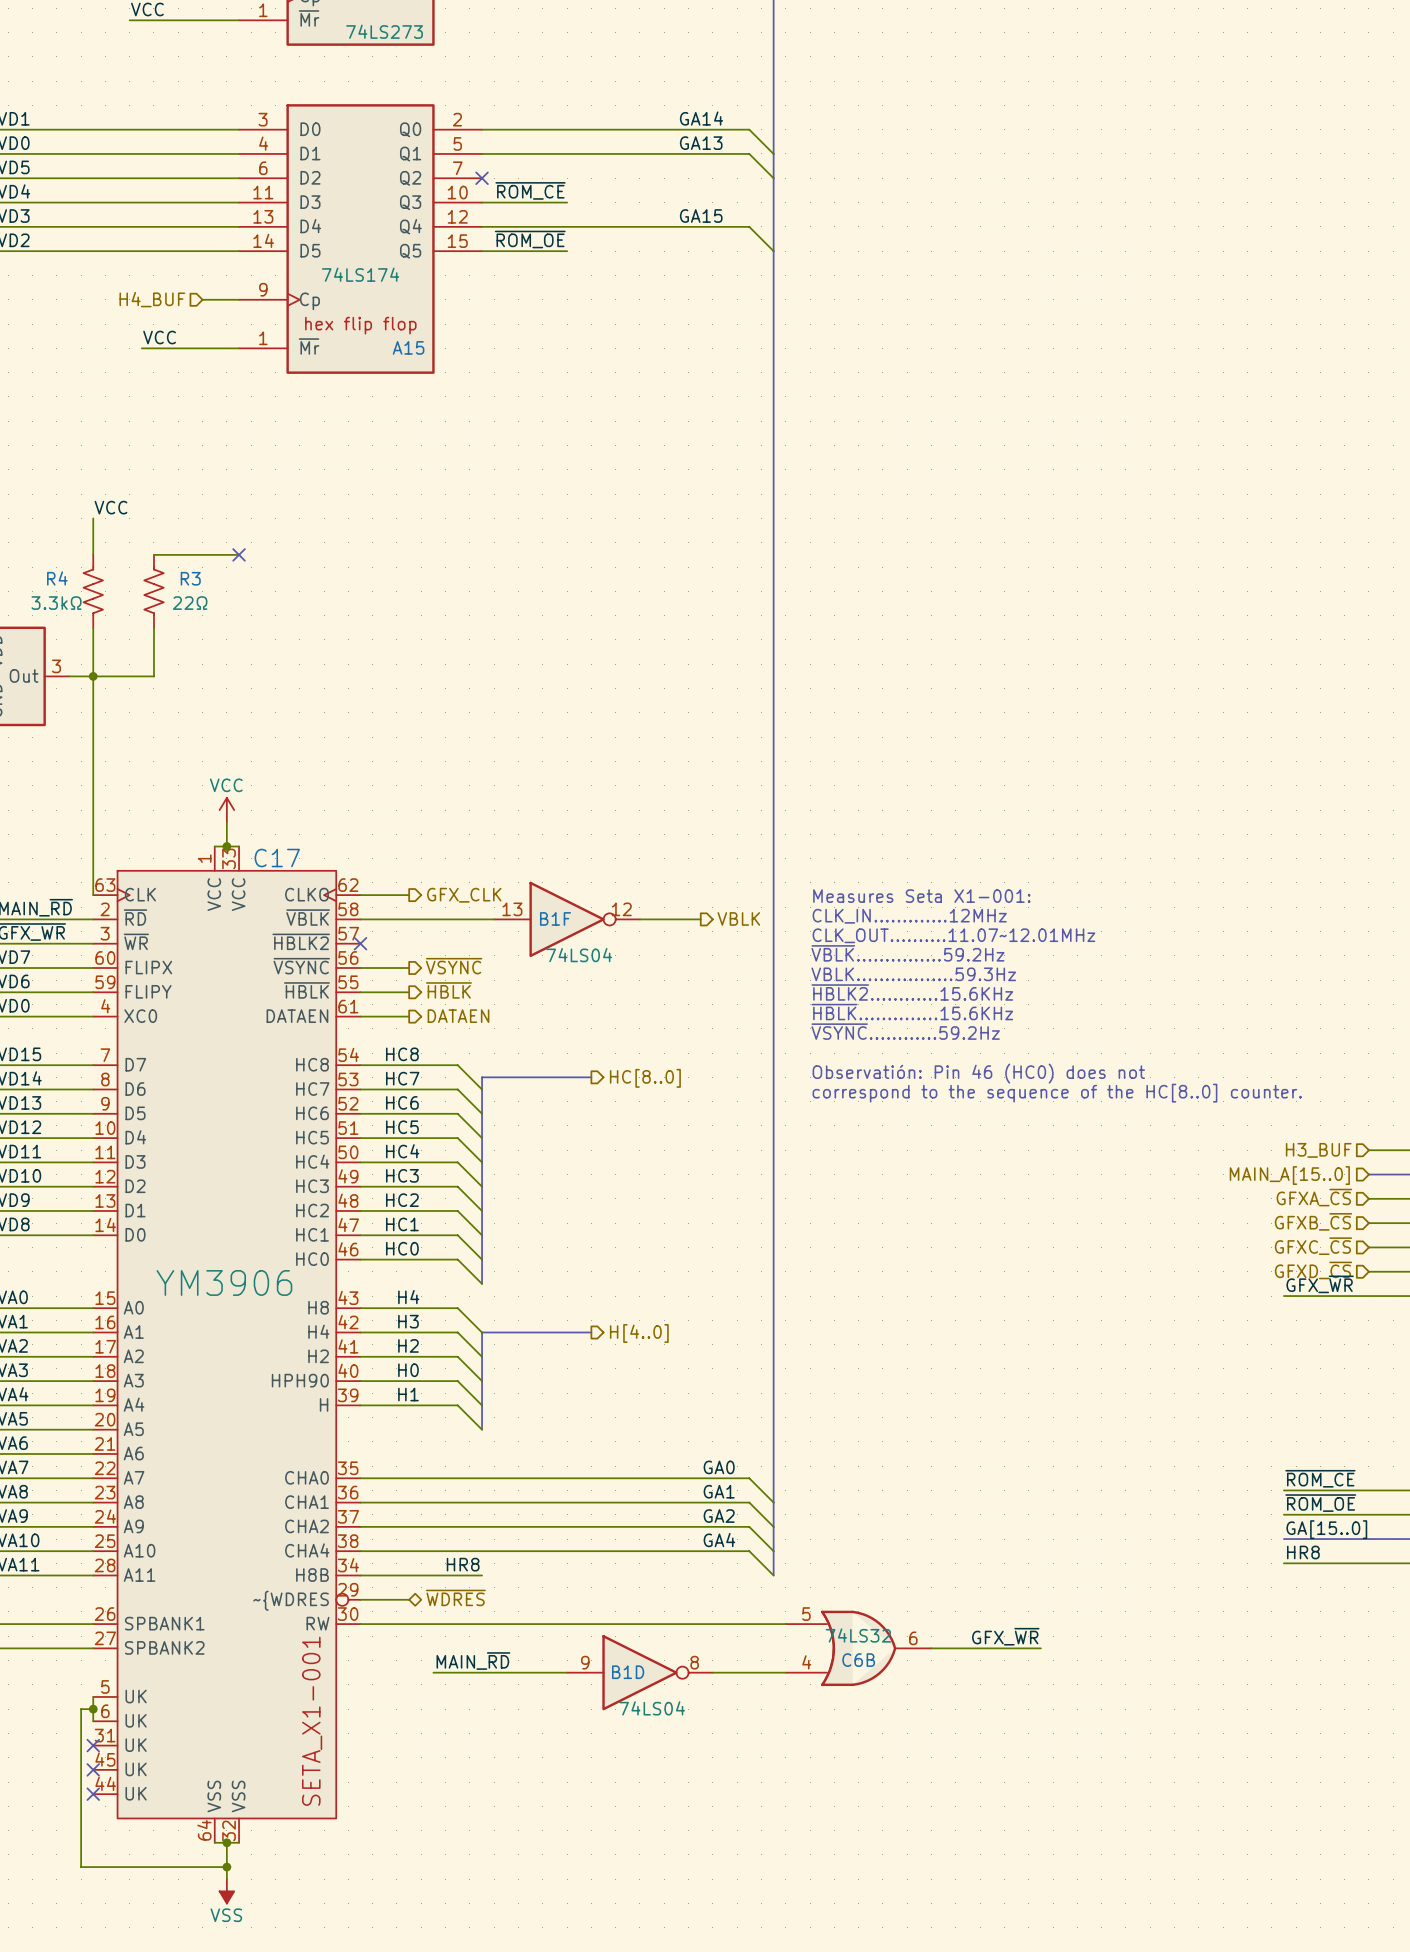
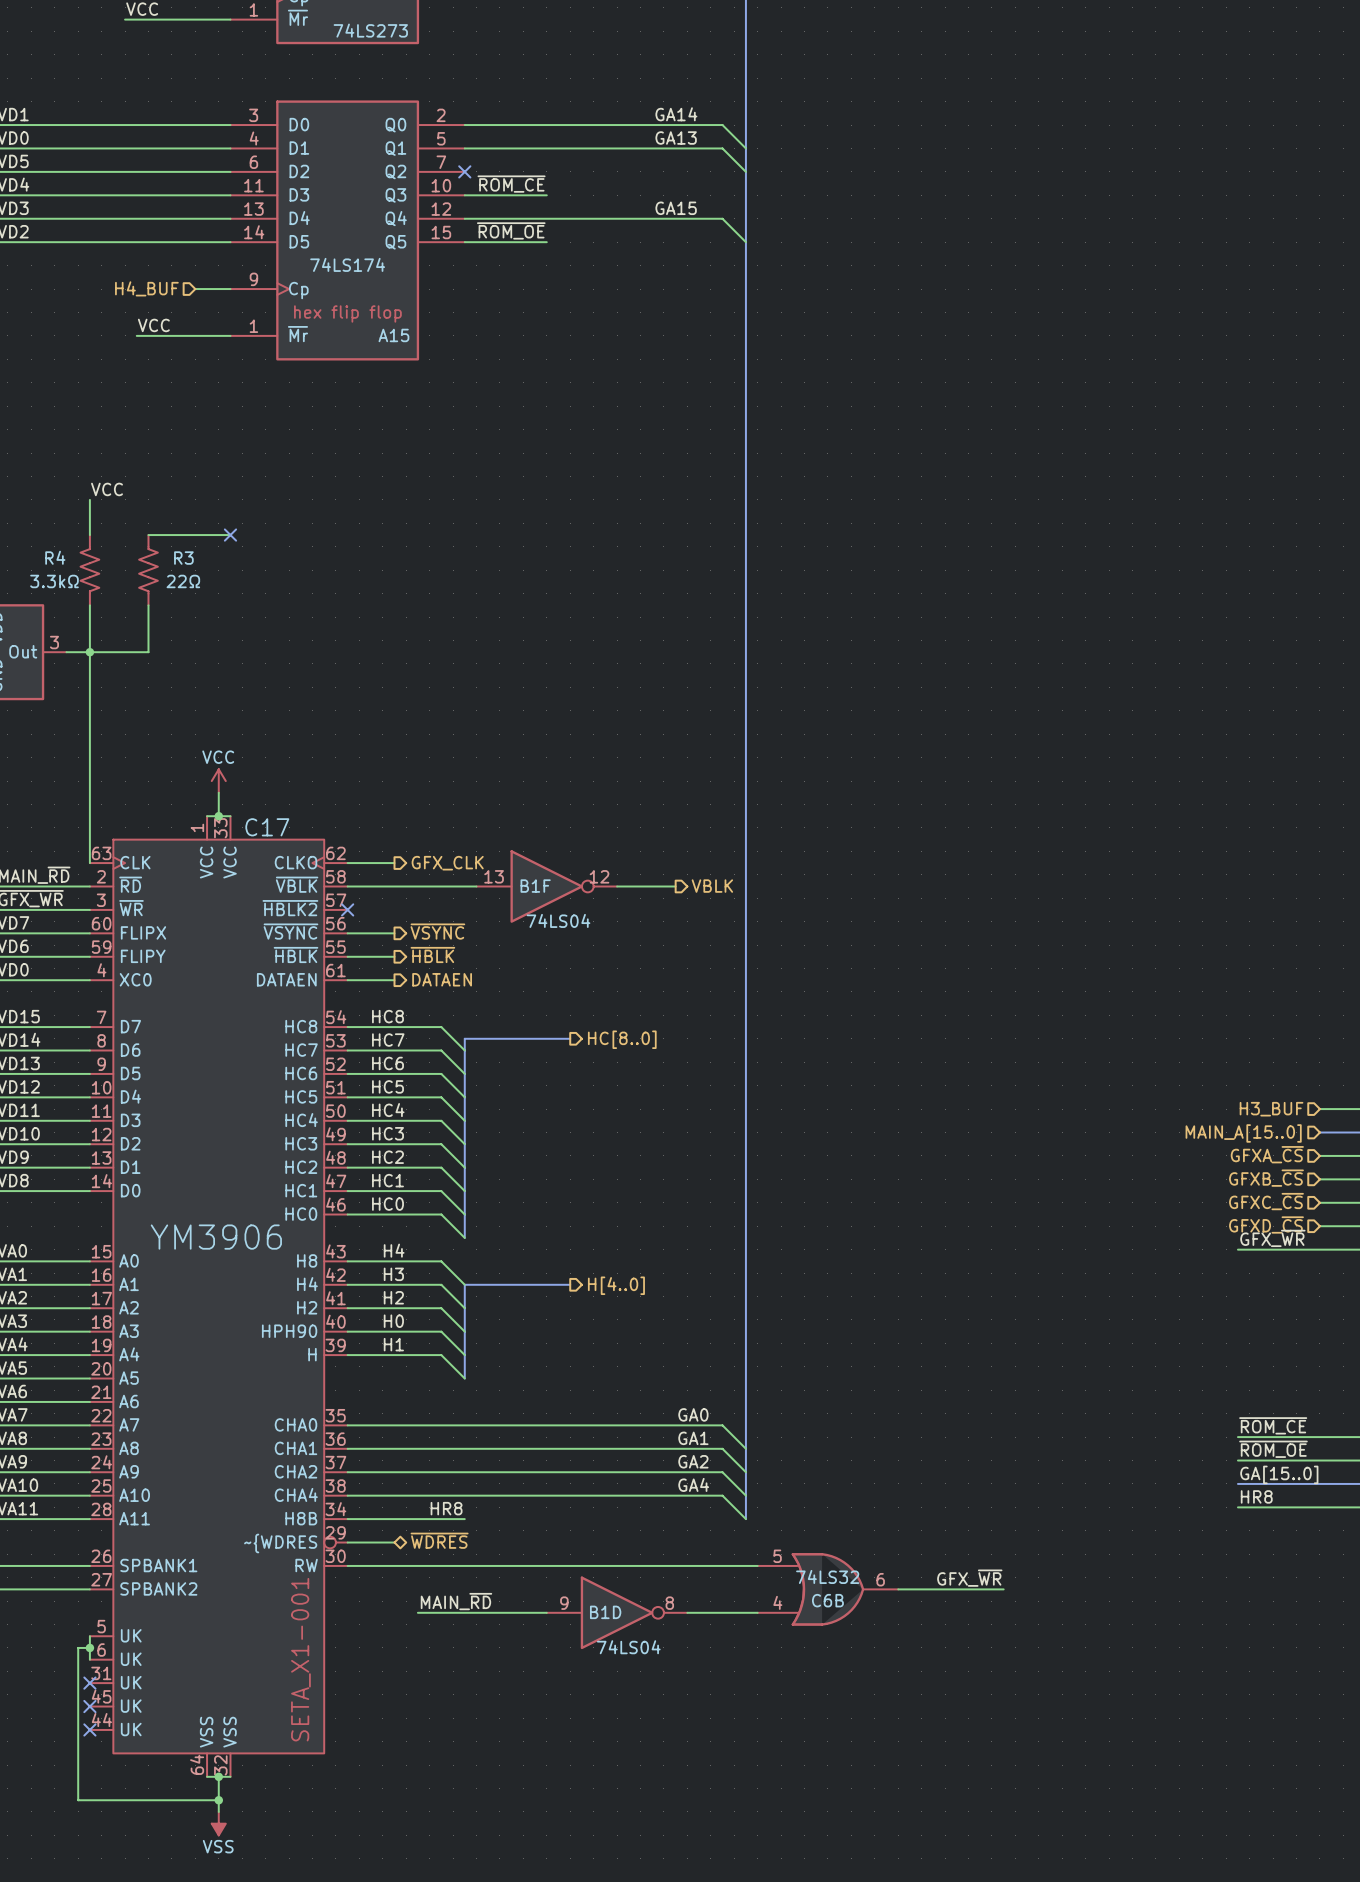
text: Measures Seta X1-001: (921, 896) -> none
text: CLK_IN.............12MHz (909, 916) -> none
text: CLK_OUT..........11.07~12.01MHz (953, 935) -> none
text: ~{VBLK}...............59.2Hz (907, 953) -> none
text: VBLK.................59.3Hz (913, 974) -> none
text: ~{HBLK2}............15.6KHz (912, 992) -> none
text: ~{HBLK}..............15.6KHz (912, 1012) -> none
text: ~{VSYNC}............59.2Hz (905, 1031) -> none
text: Observatión: Pin 46 (HC0) does not (978, 1073) -> none
text: correspond to the sequence of the HC[8..0] counter. (1057, 1093) -> none

